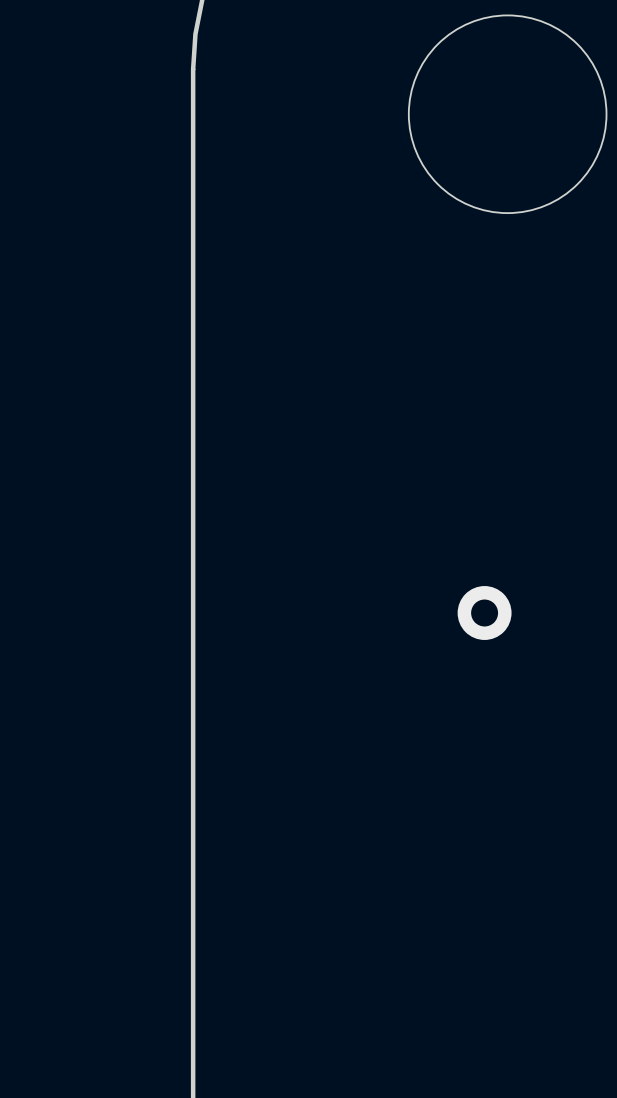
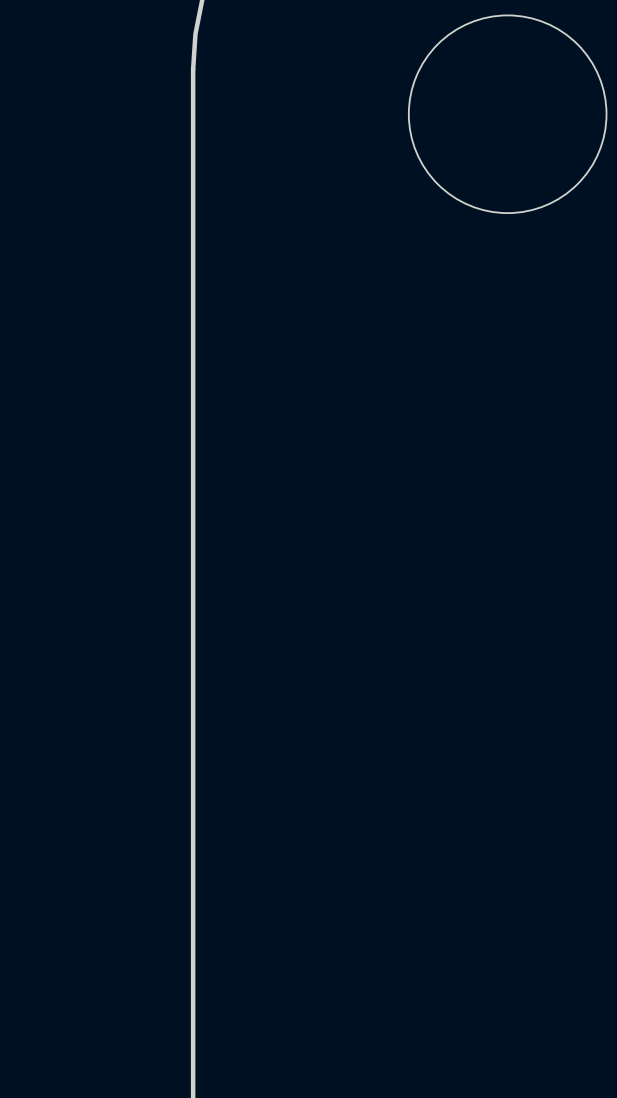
via: (484, 613) -> none

